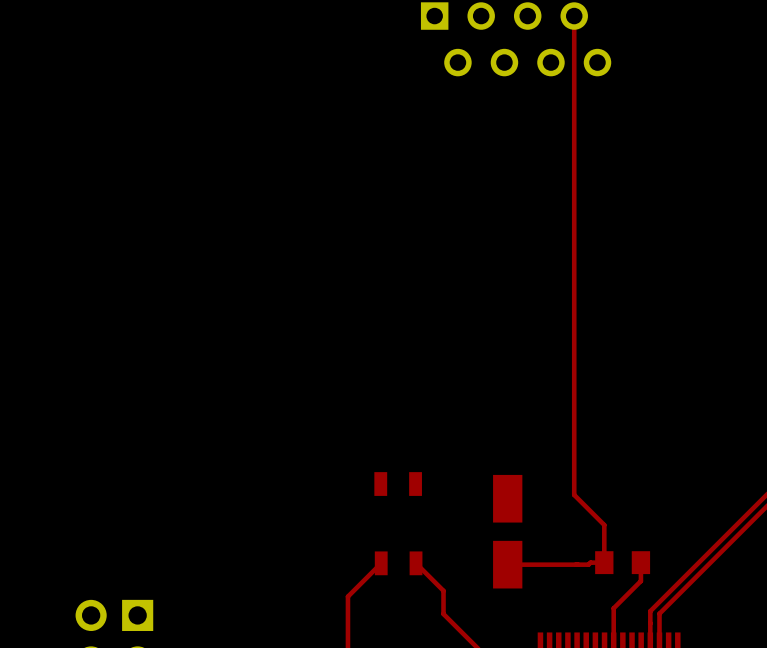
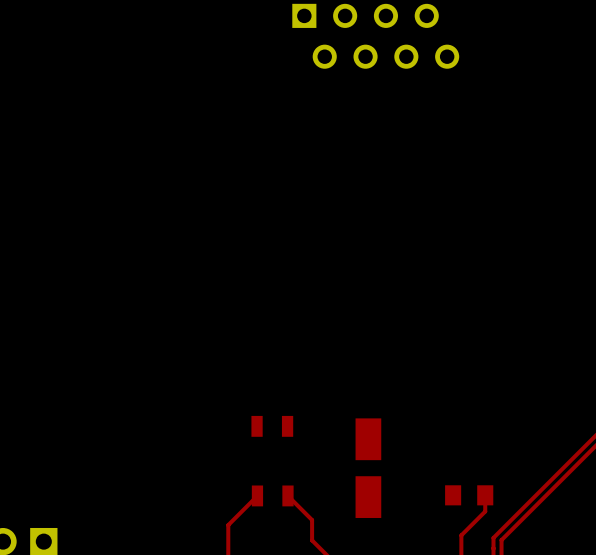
top track: (574, 16) (574, 494) (604, 525) (604, 562) (590, 562) (588, 564) (507, 564) -> none

